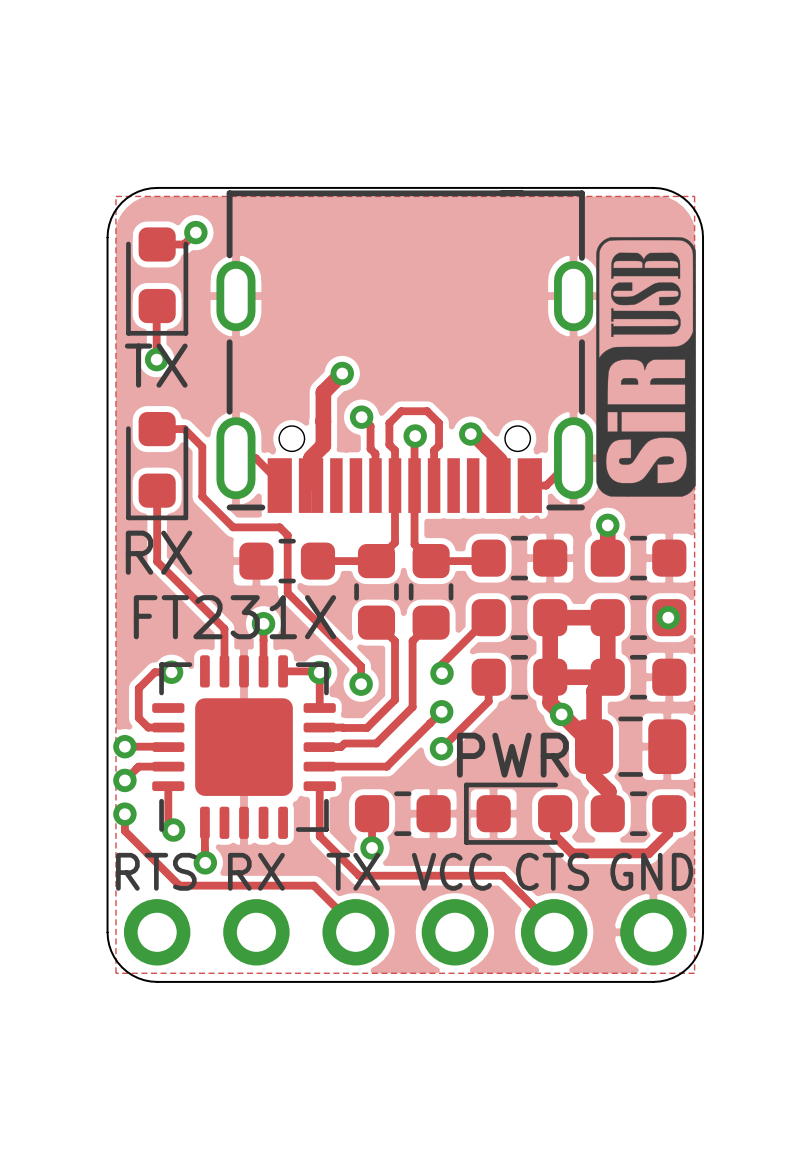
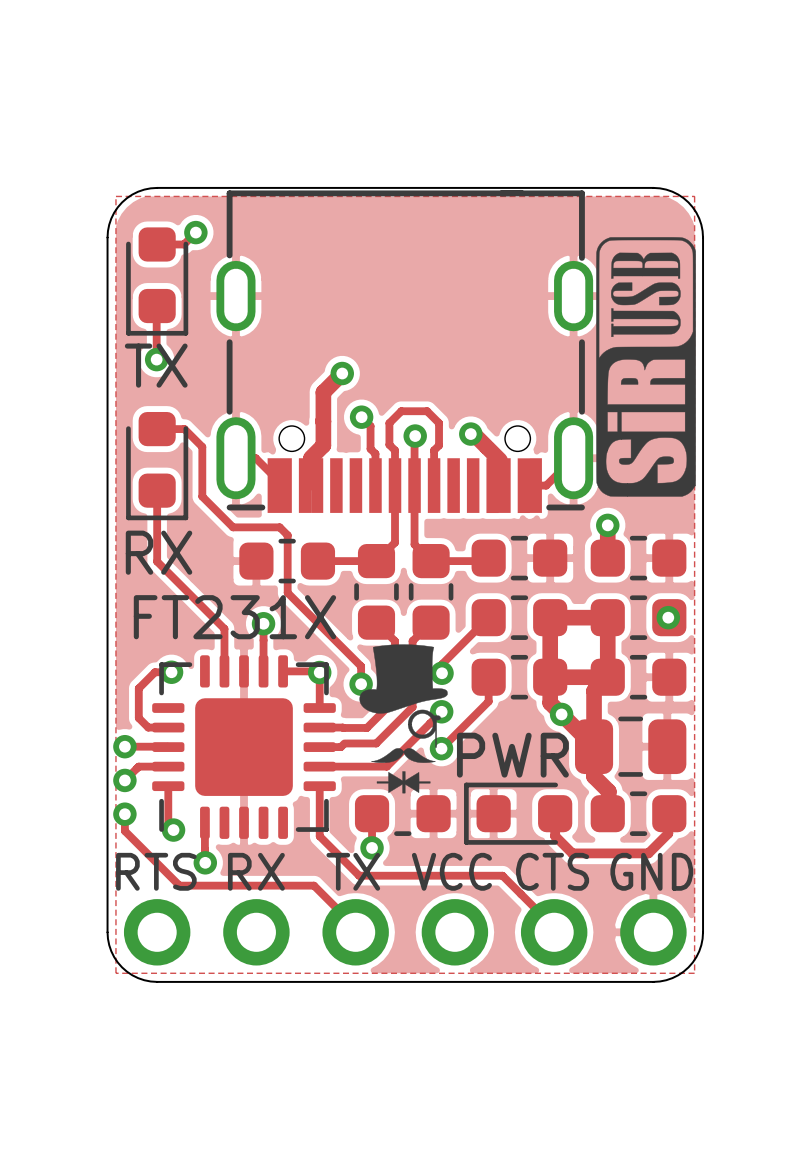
drawing: none -> [359, 644, 448, 794]
part footprint: [354, 791, 451, 836] -> [354, 795, 451, 836]

